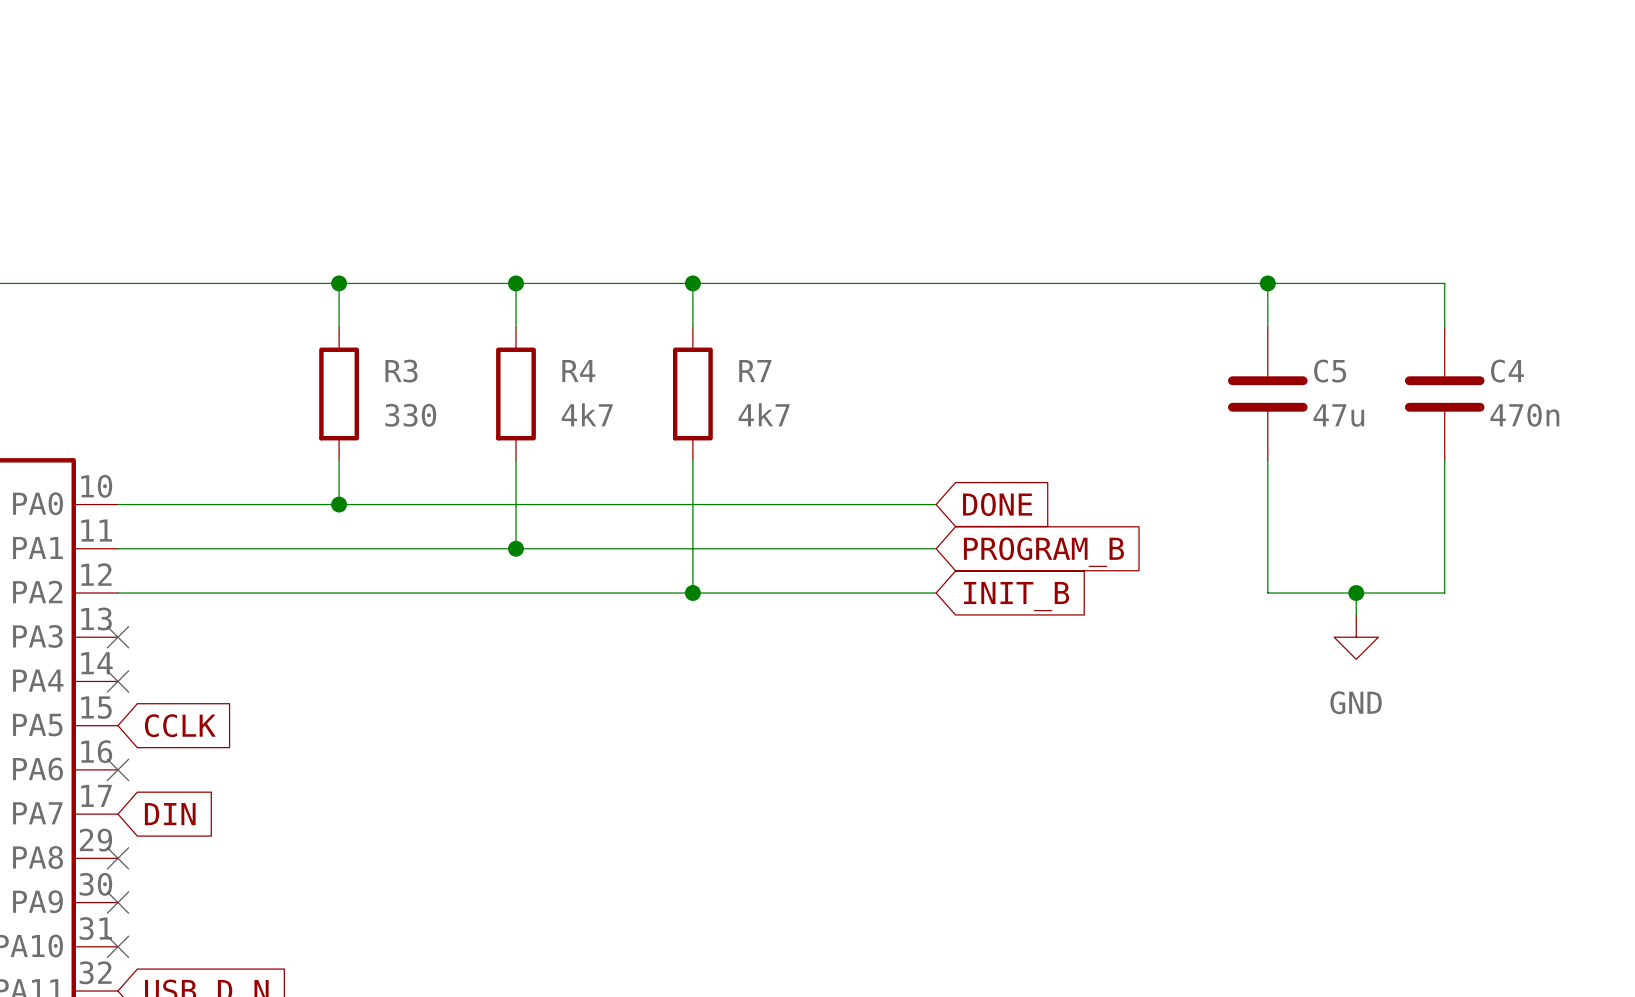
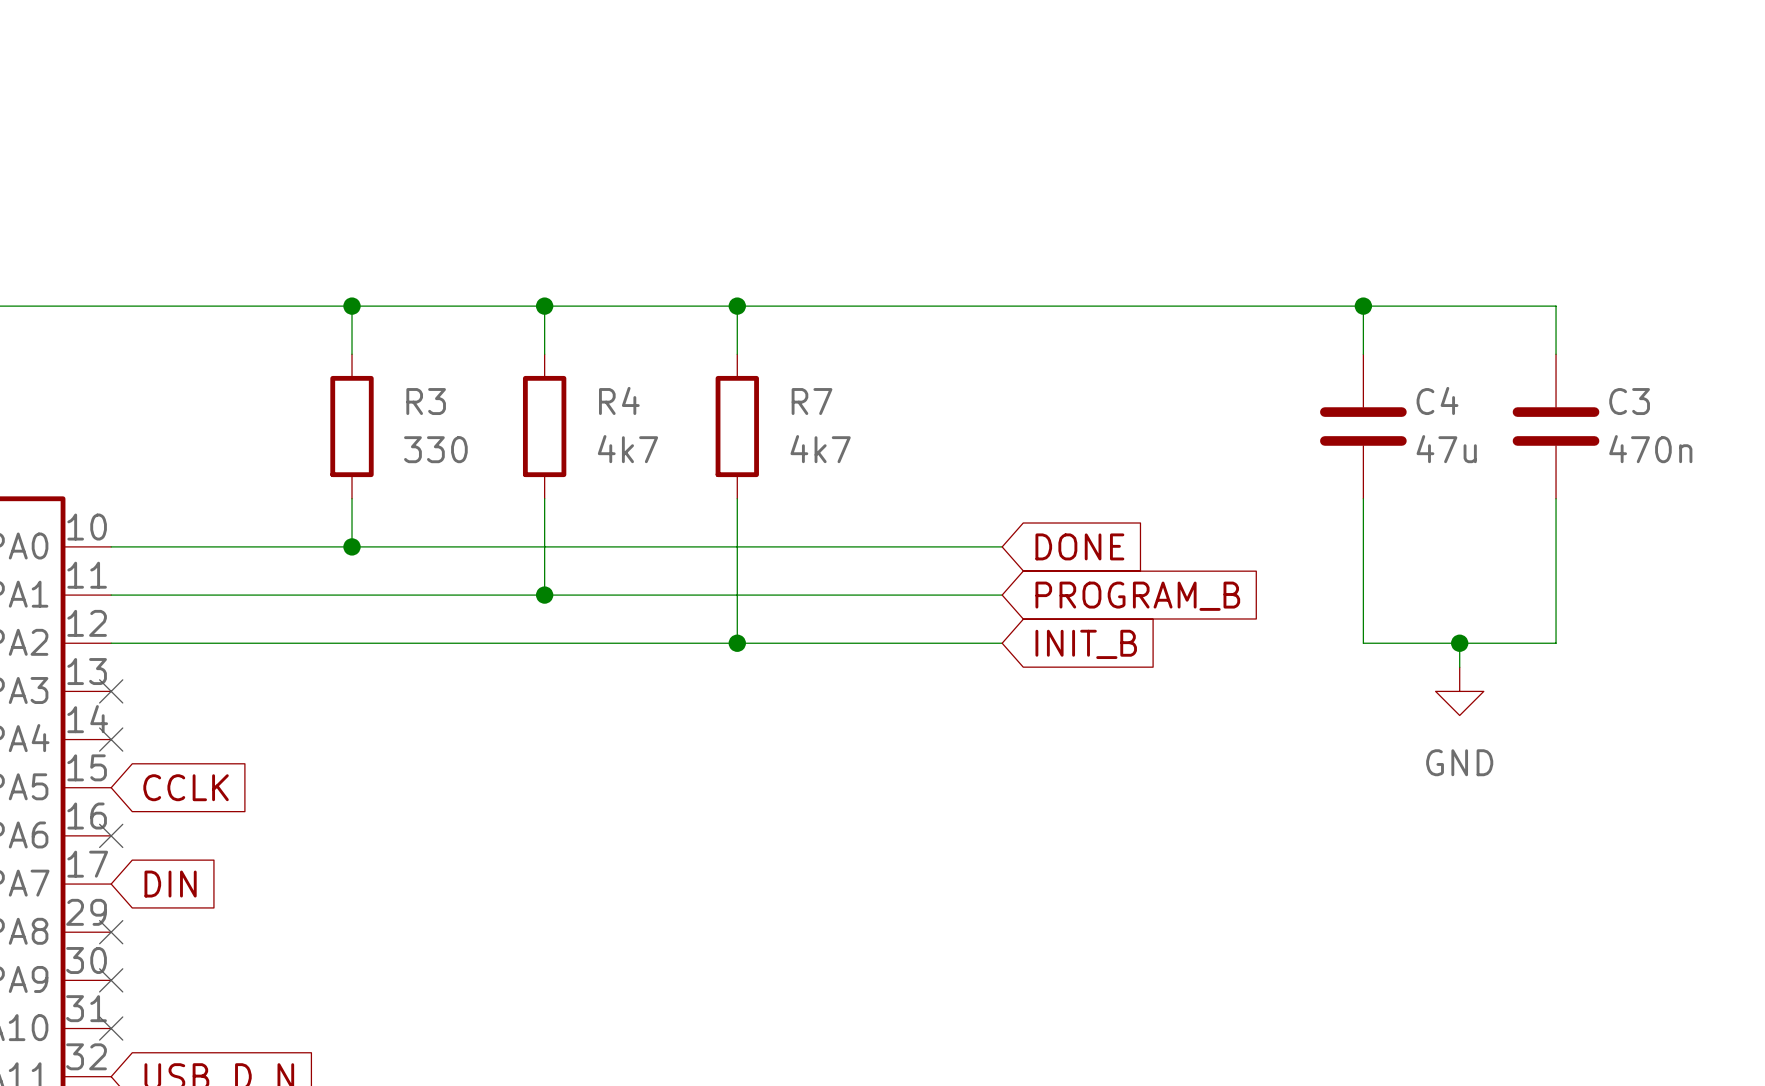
C5 name: C5 (1330, 371) -> C4 (1437, 400)
C4 name: C4 (1507, 371) -> C3 (1629, 401)

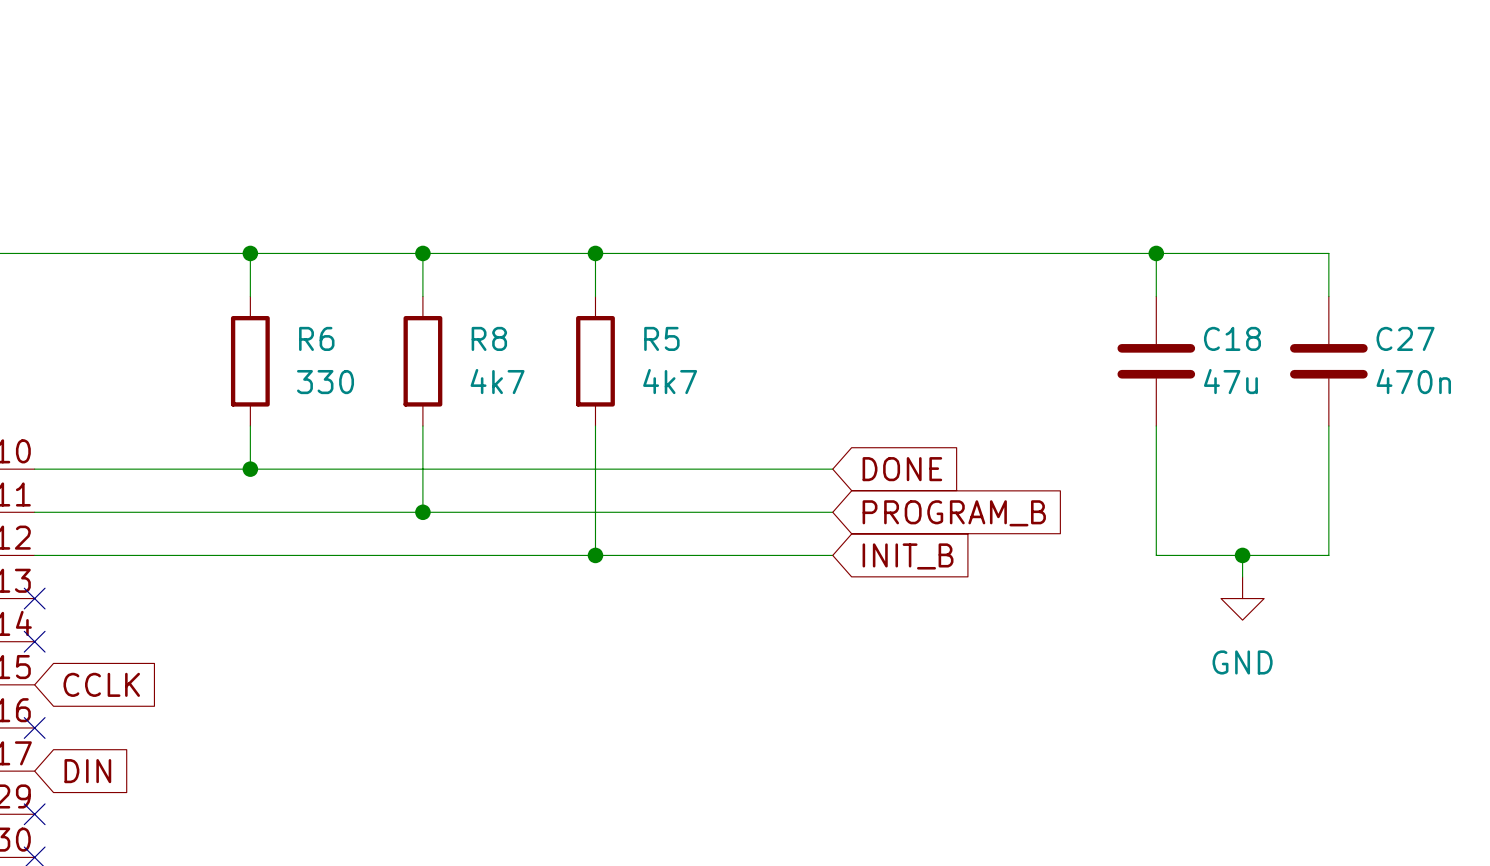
R4 name: R4 (619, 400) -> R8 (489, 338)
C4 name: C4 (1437, 400) -> C18 (1232, 338)
R3 name: R3 (426, 401) -> R6 (316, 338)
R7 name: R7 (812, 401) -> R5 (661, 338)
C3 name: C3 (1629, 401) -> C27 (1405, 338)

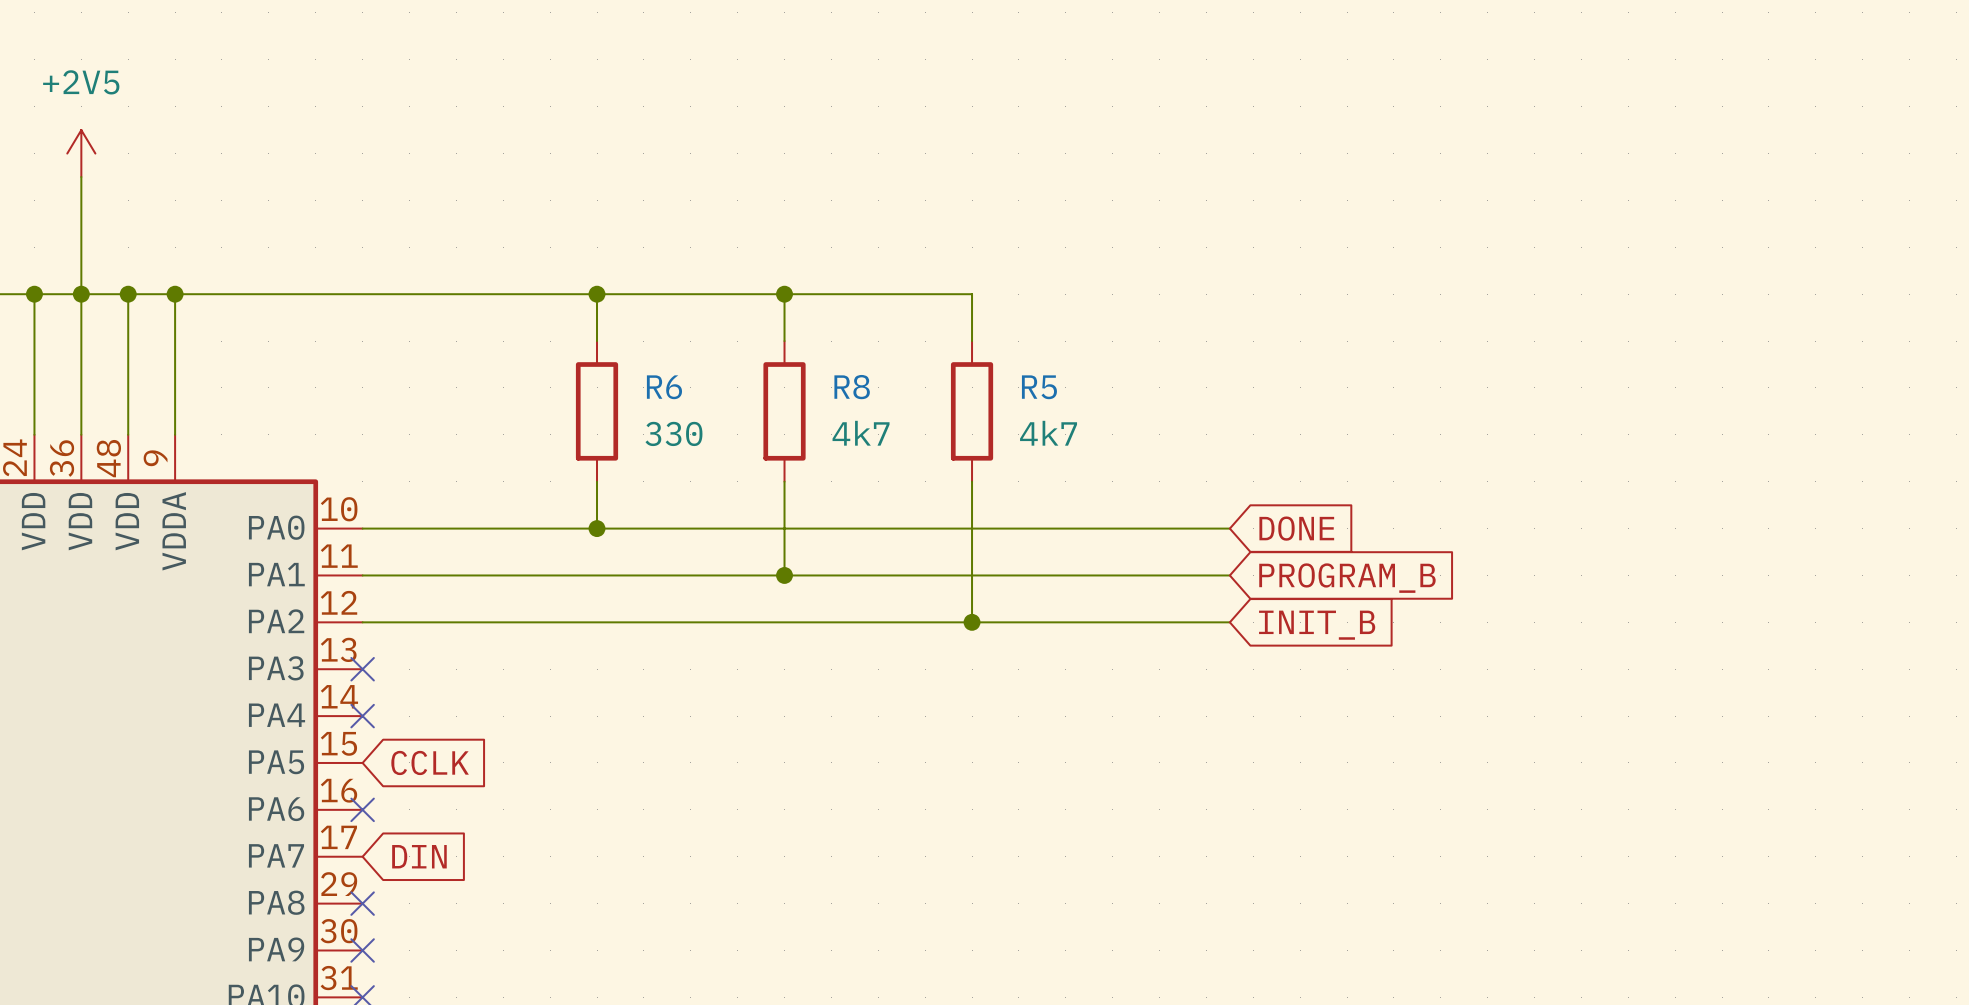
wire: (595, 253) (1328, 253) (1328, 296) -> none
junction: (595, 253) -> none
wire: (1156, 253) (1156, 296) -> none
junction: (1156, 253) -> none
C18: 47u (1156, 361) -> none
C27: 470n (1328, 361) -> none
wire: (1156, 426) (1156, 555) (1328, 555) (1328, 426) -> none
wire: (1242, 555) (1242, 577) -> none
junction: (1242, 555) -> none
power symbol: GND (1242, 598) -> none

